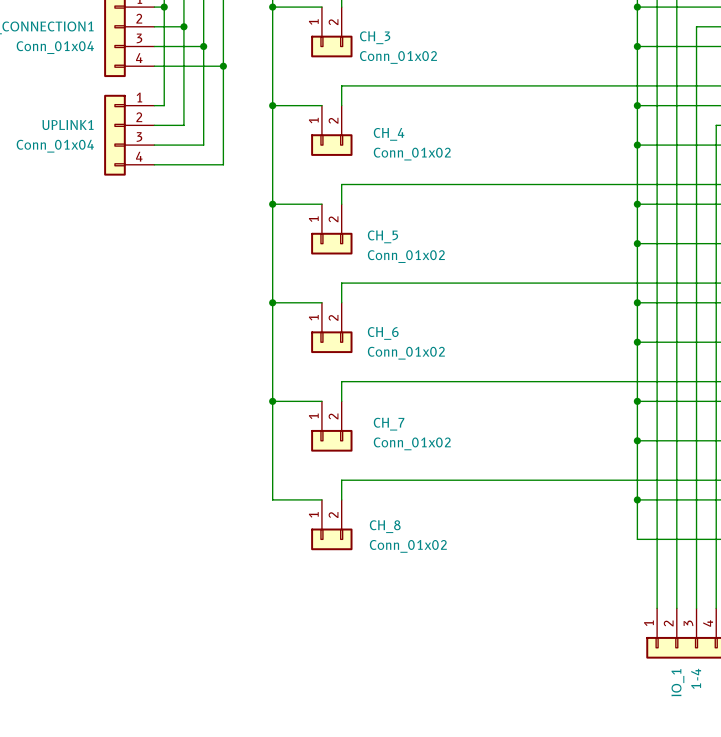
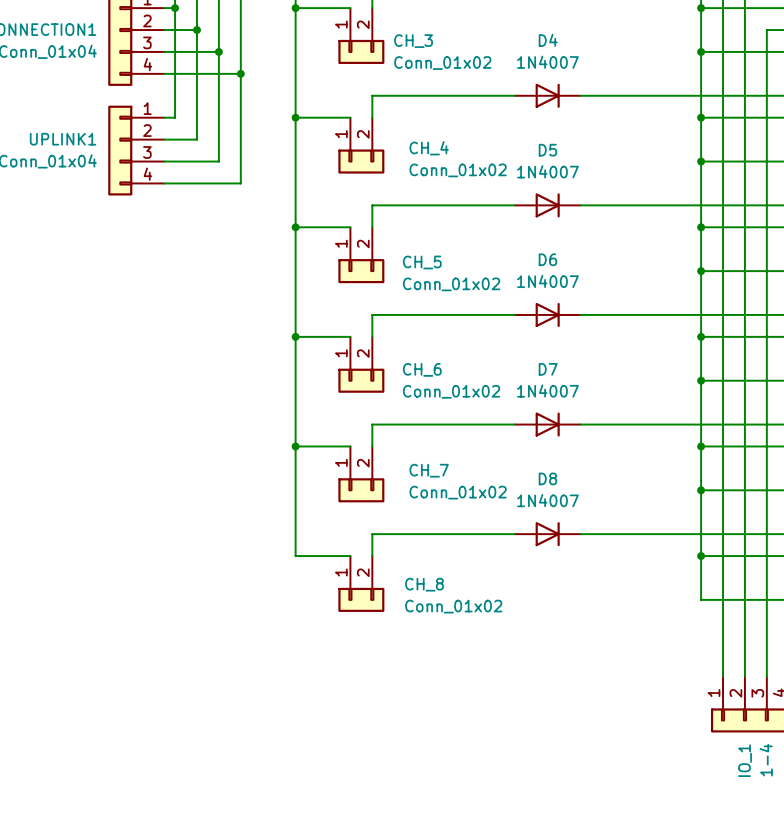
D4: none -> 1N4007 (547, 95)
D5: none -> 1N4007 (547, 205)
D6: none -> 1N4007 (547, 314)
D7: none -> 1N4007 (547, 424)
D8: none -> 1N4007 (547, 534)

